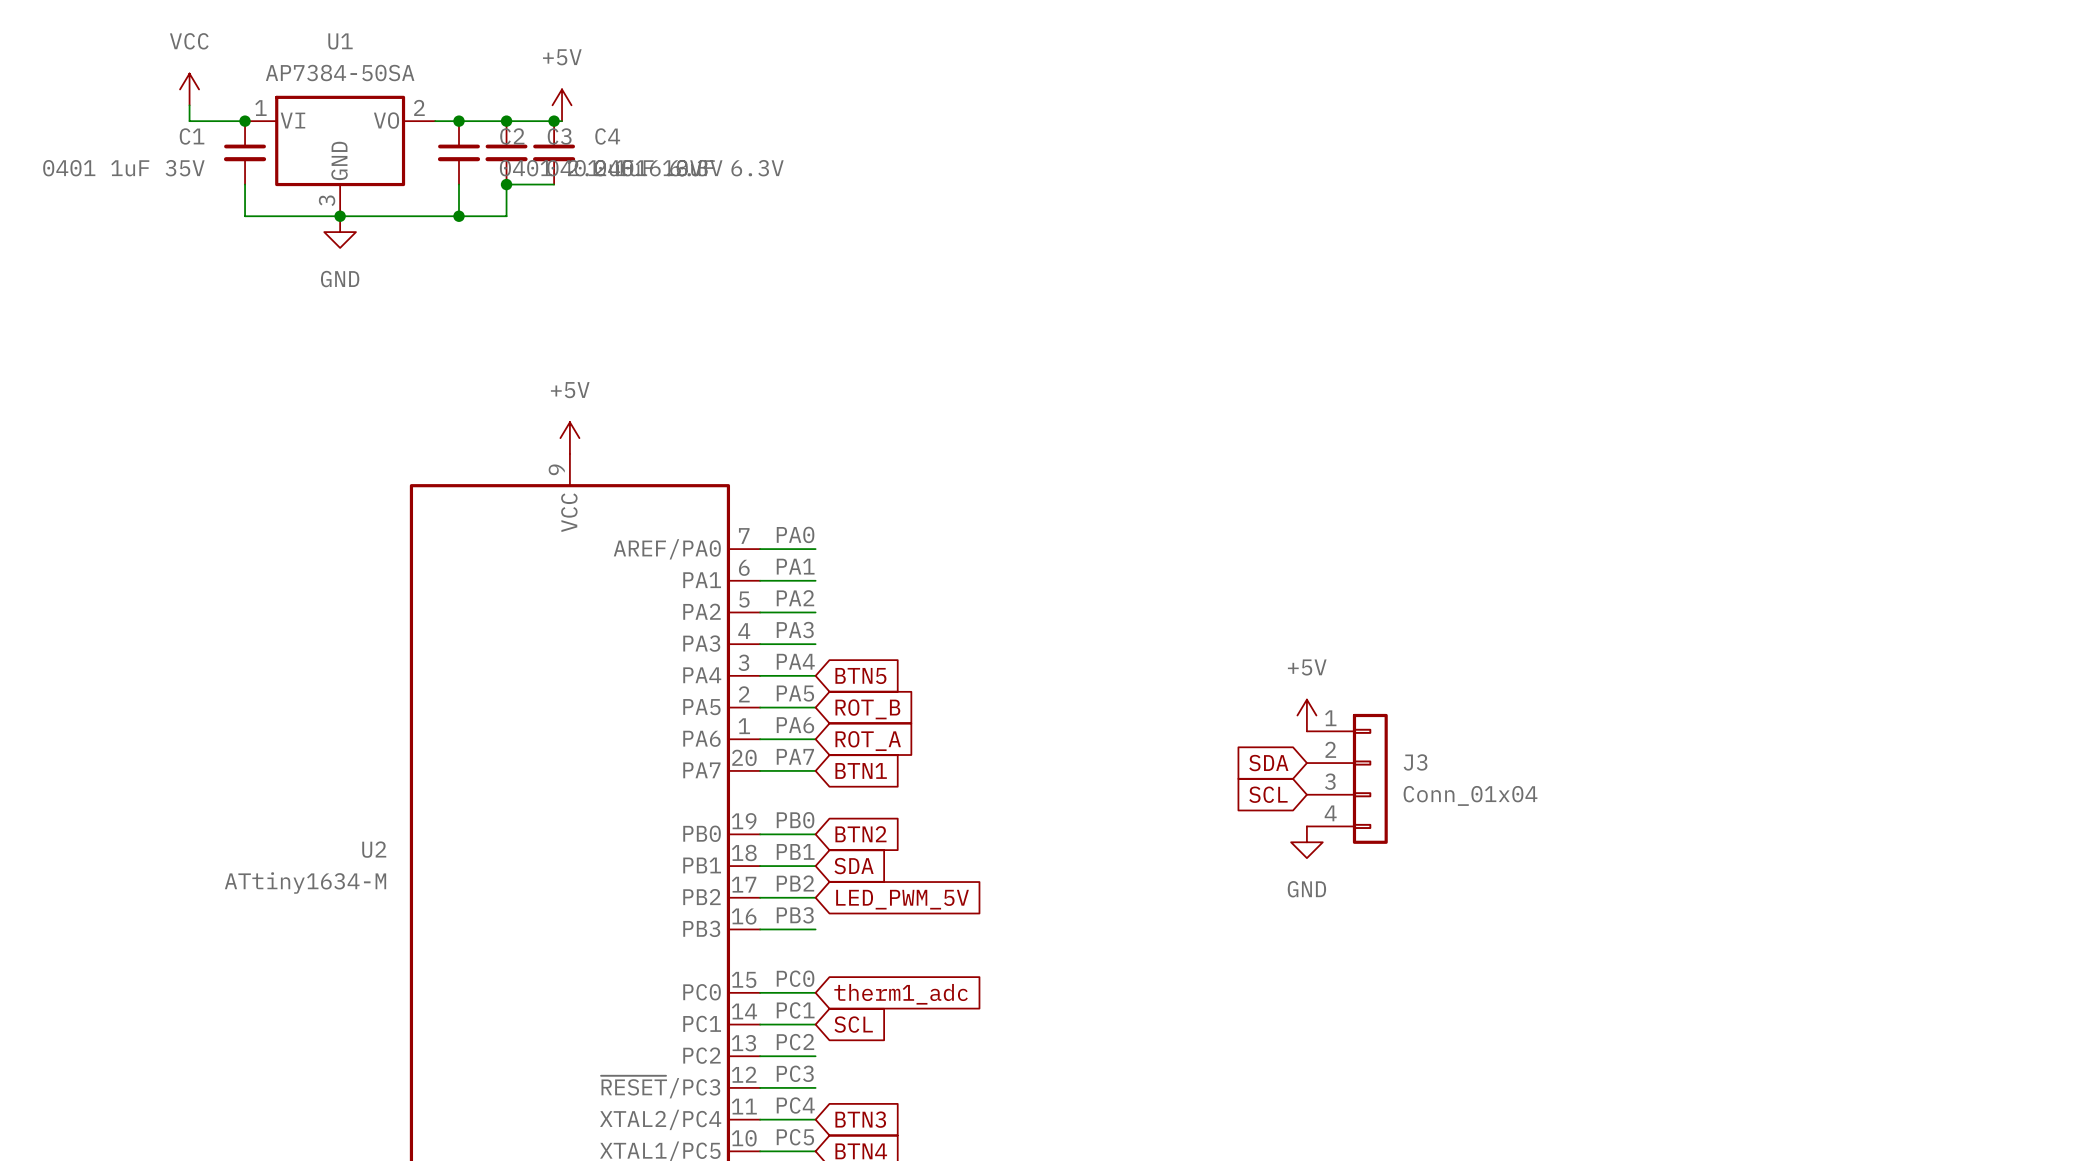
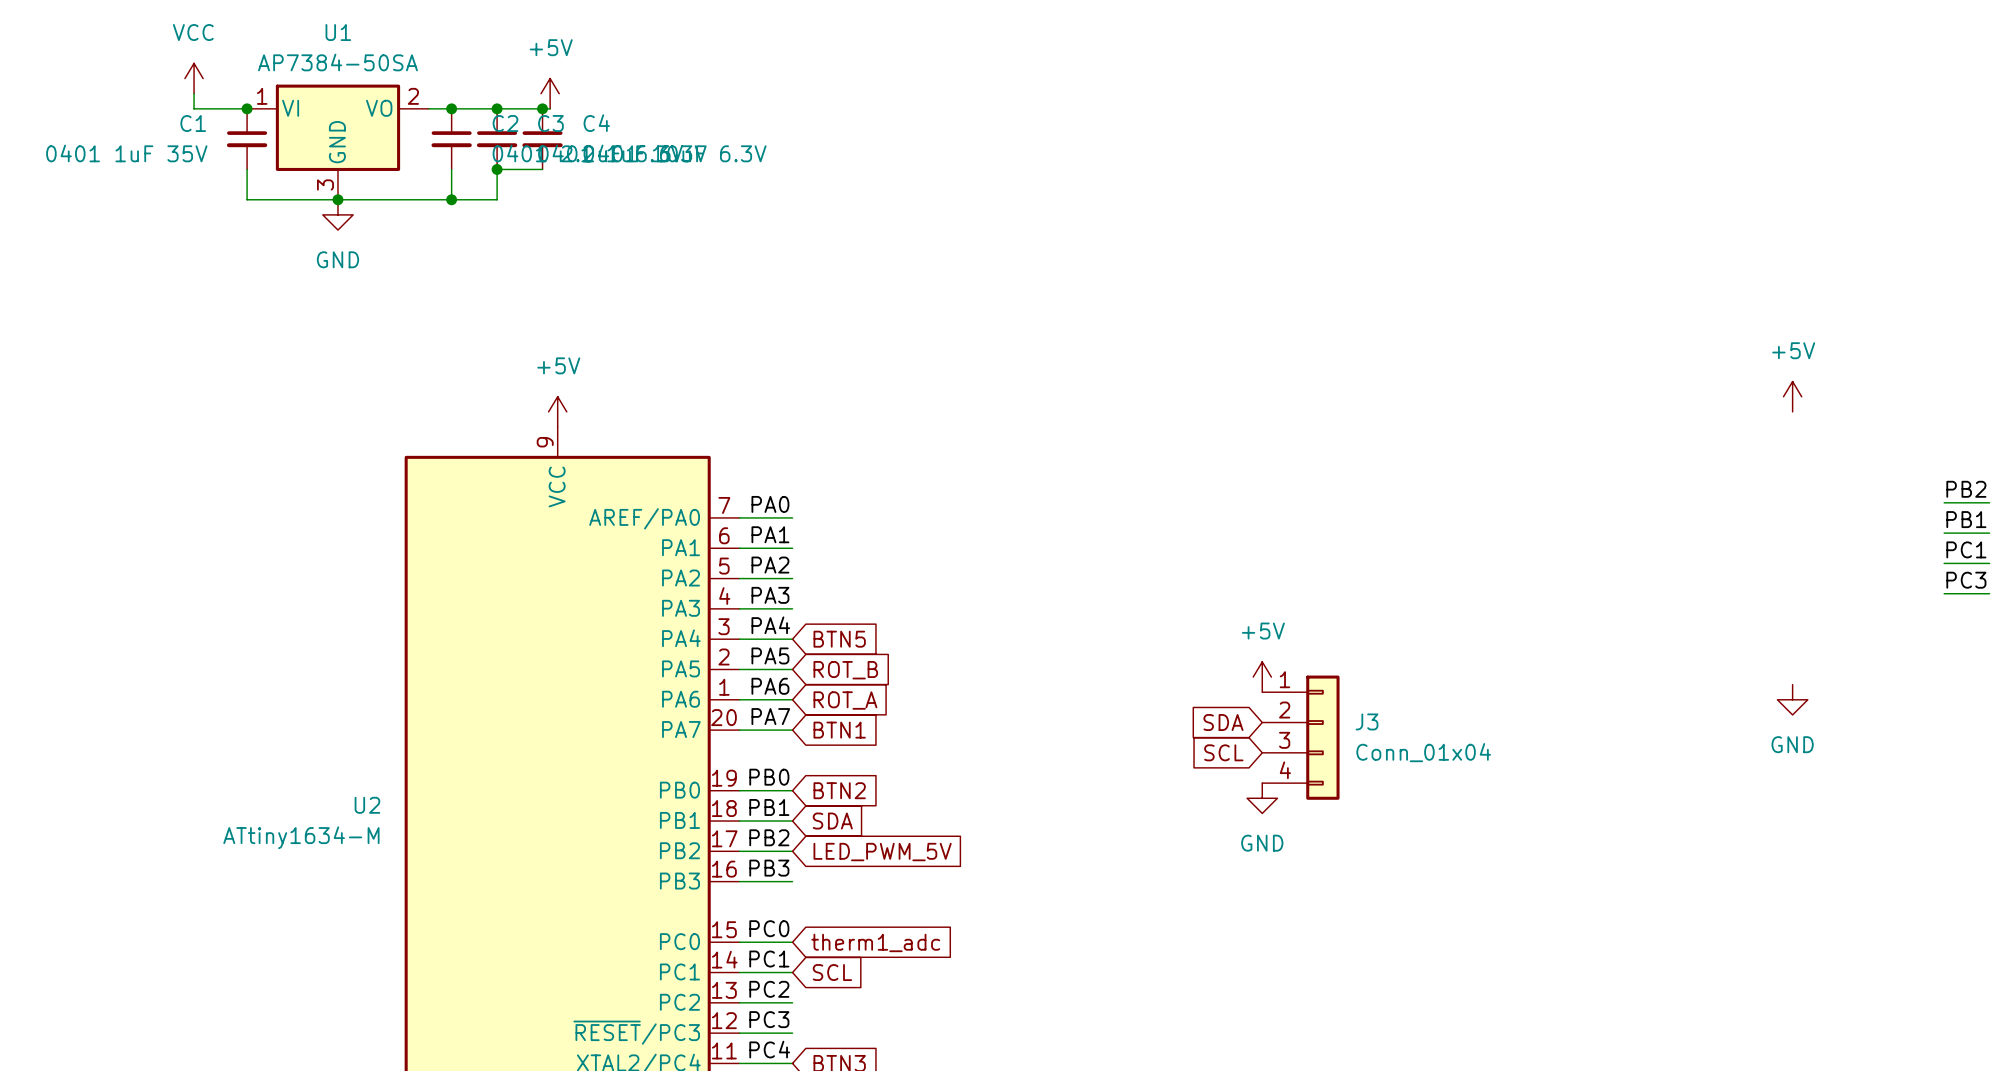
power symbol: none -> +5V (1792, 396)
label: none -> PB2 (1966, 489)
wire: none -> (1944, 502) (1989, 502)
label: none -> PB1 (1966, 519)
wire: none -> (1944, 533) (1989, 533)
label: none -> PC1 (1966, 549)
wire: none -> (1944, 563) (1989, 563)
label: none -> PC3 (1966, 580)
wire: none -> (1944, 593) (1989, 593)
power symbol: none -> GND (1792, 699)

